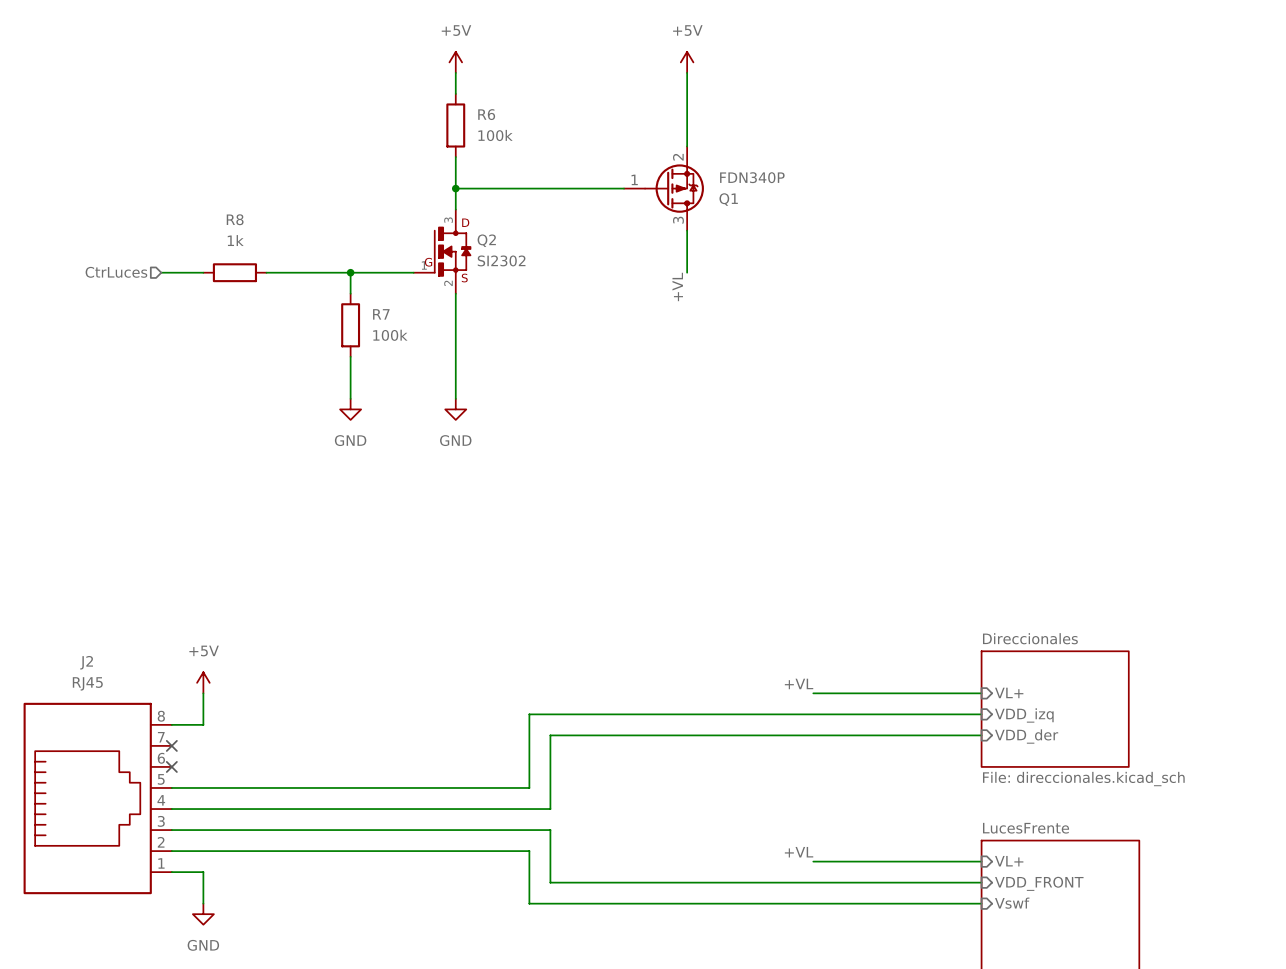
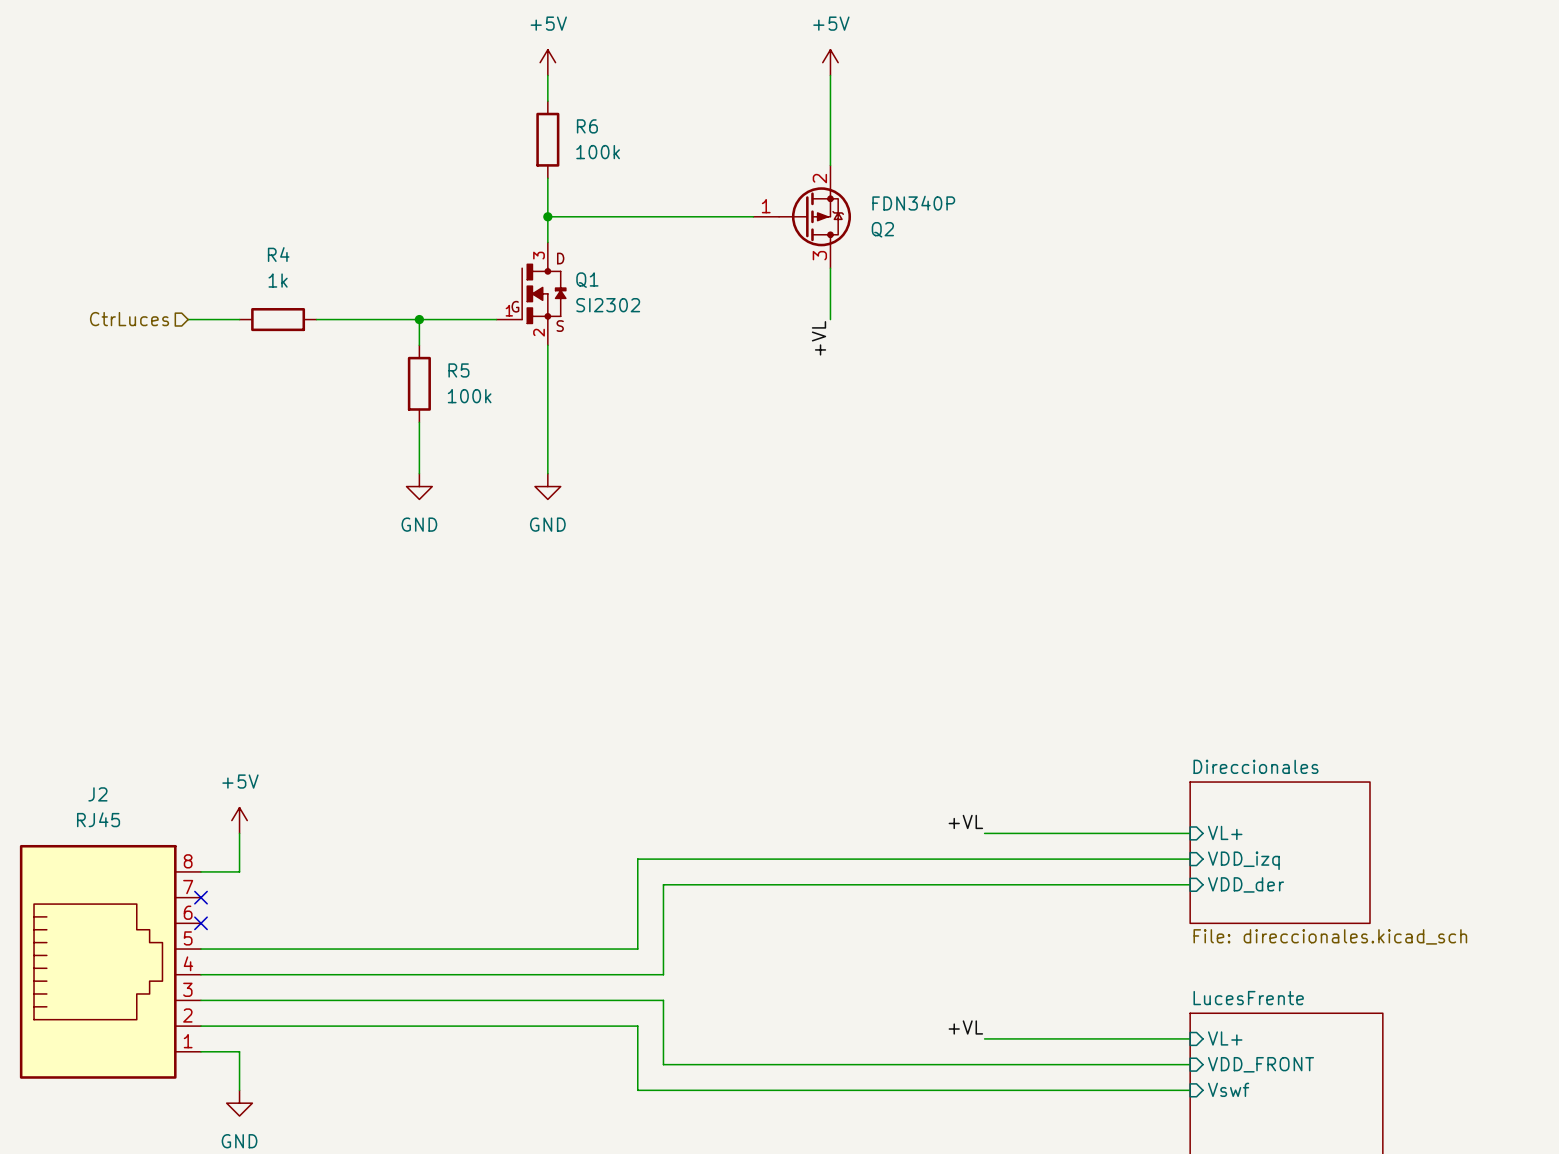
Q1 name: Q1 (728, 199) -> Q2 (882, 229)
R8 name: R8 (235, 219) -> R4 (278, 254)
Q2 name: Q2 (486, 240) -> Q1 (587, 280)
R7 name: R7 (381, 314) -> R5 (458, 370)

